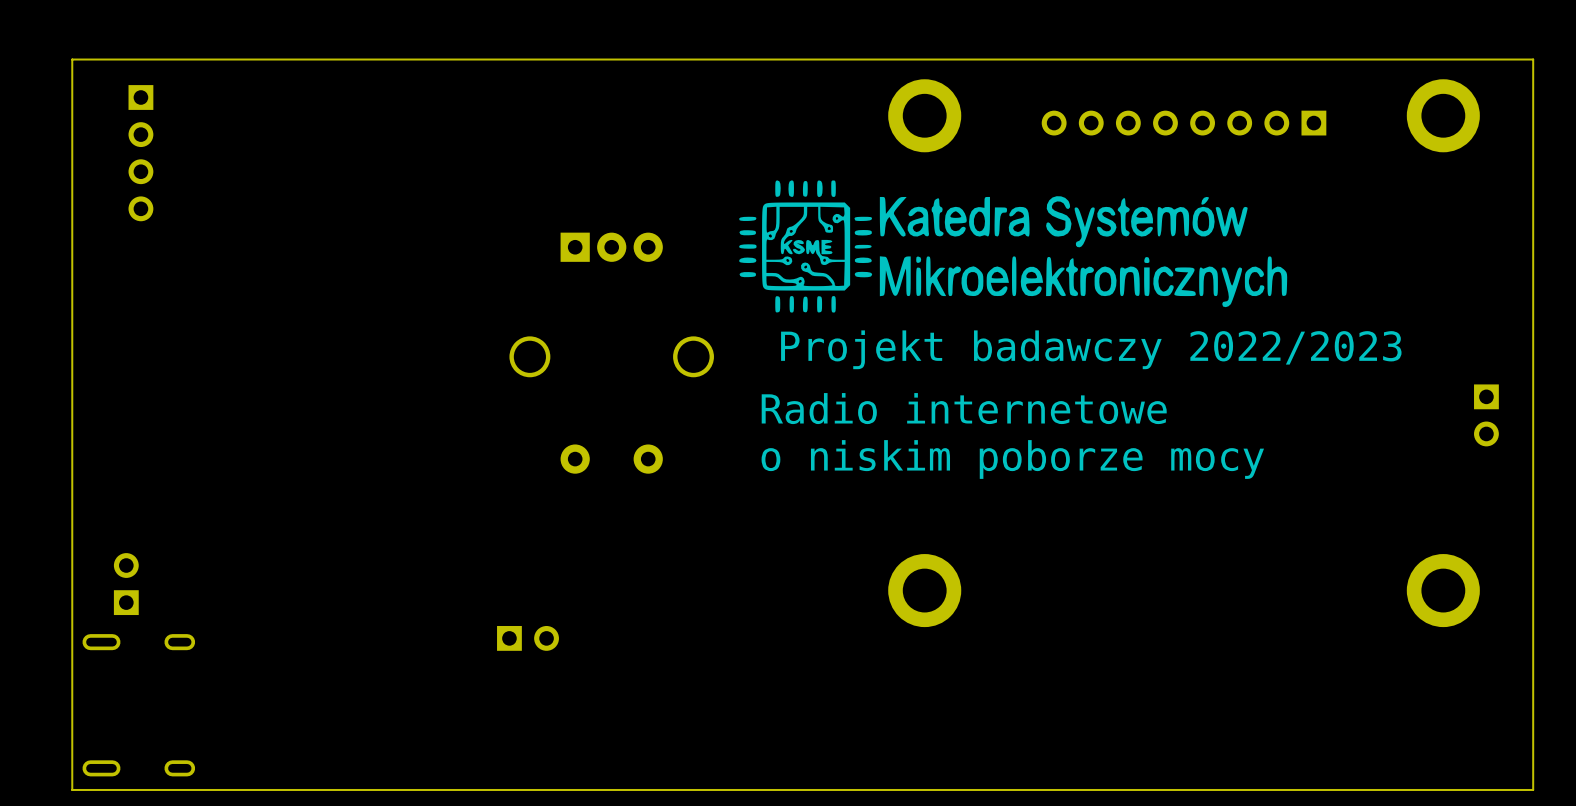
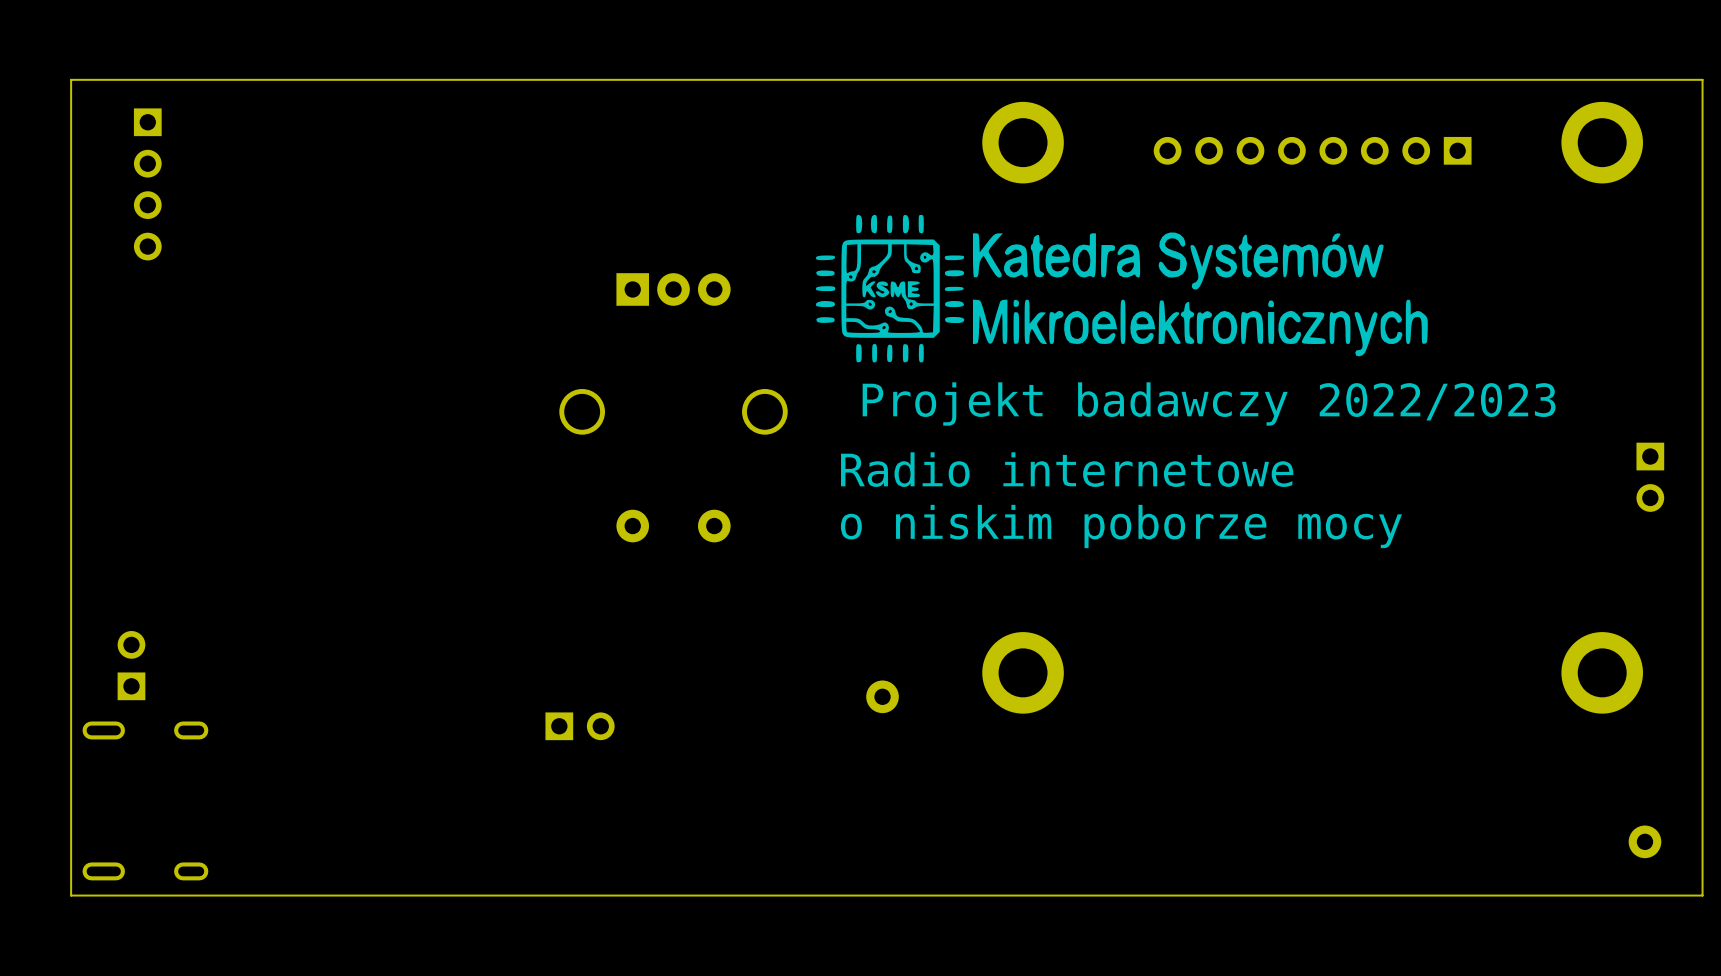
part: none -> (882, 696)
part: none -> (1644, 841)

